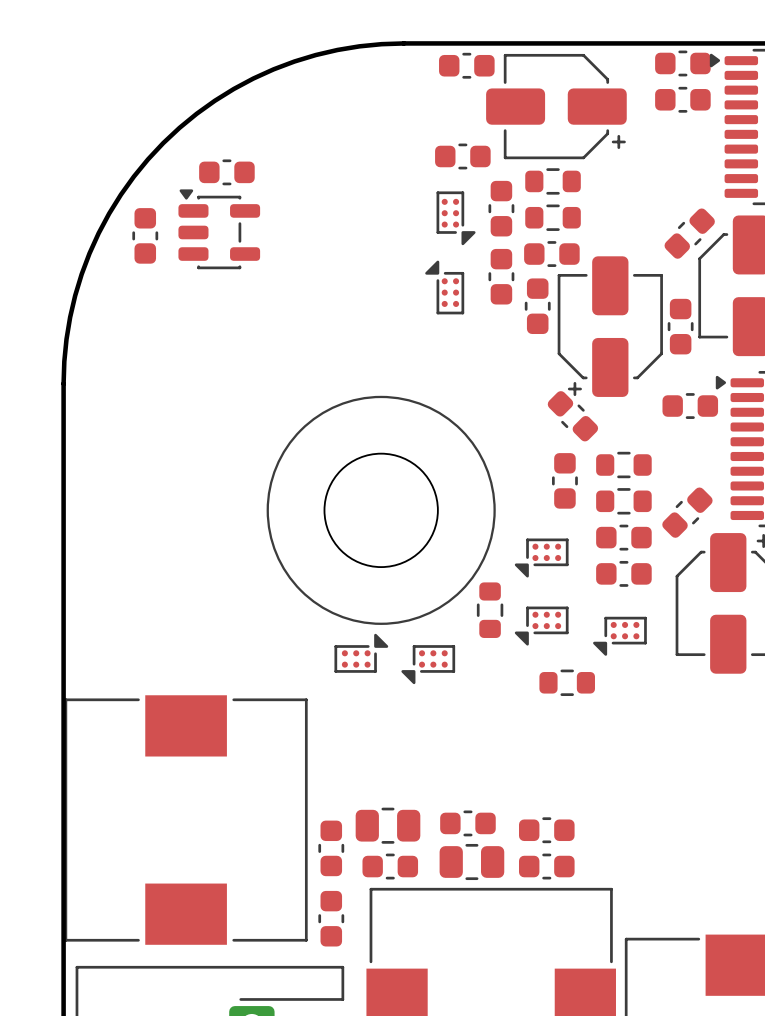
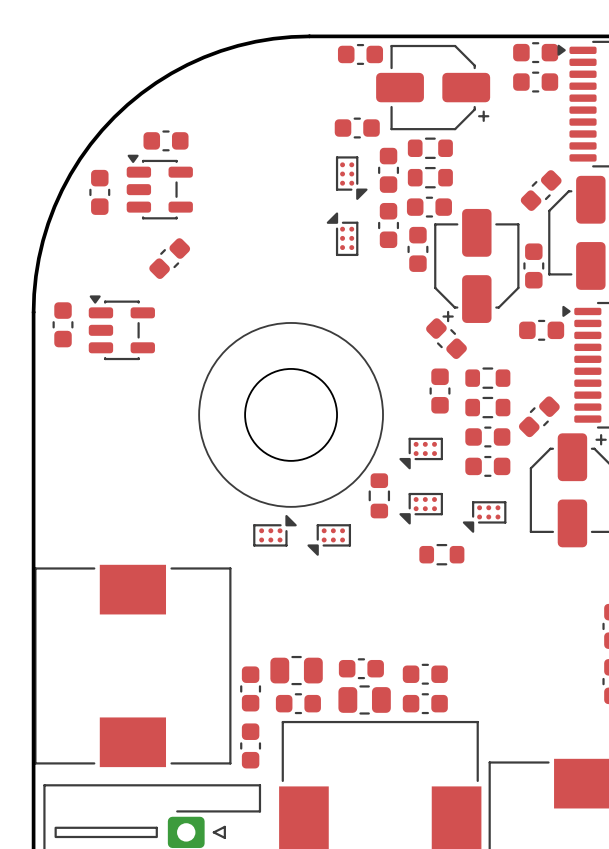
part: none -> (169, 258)
part: none -> (63, 324)
part: none -> (121, 327)

